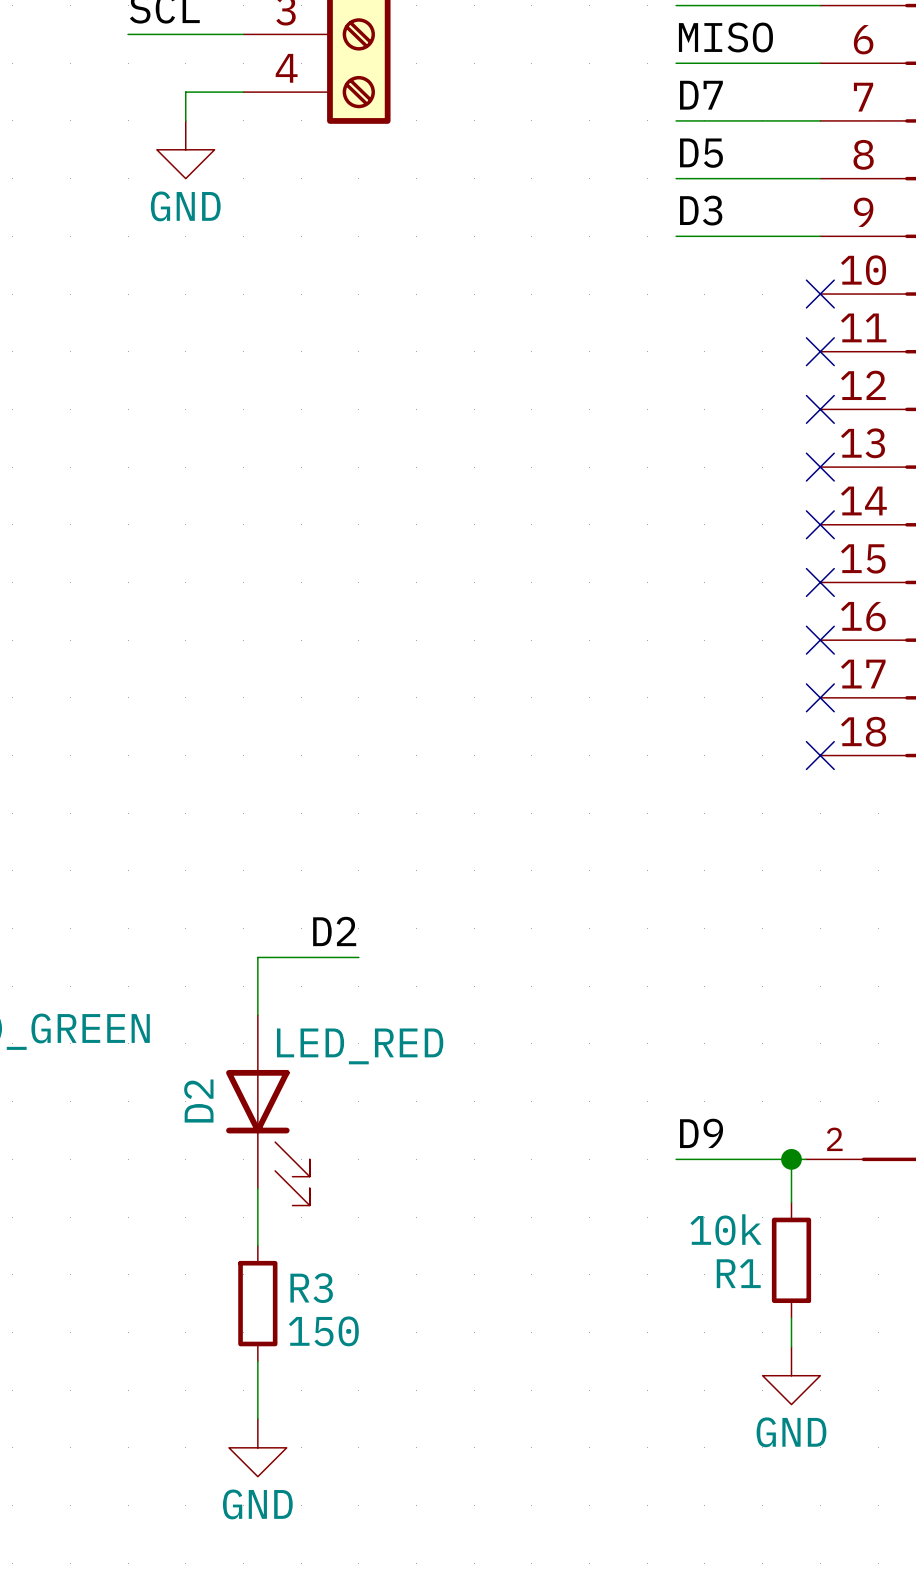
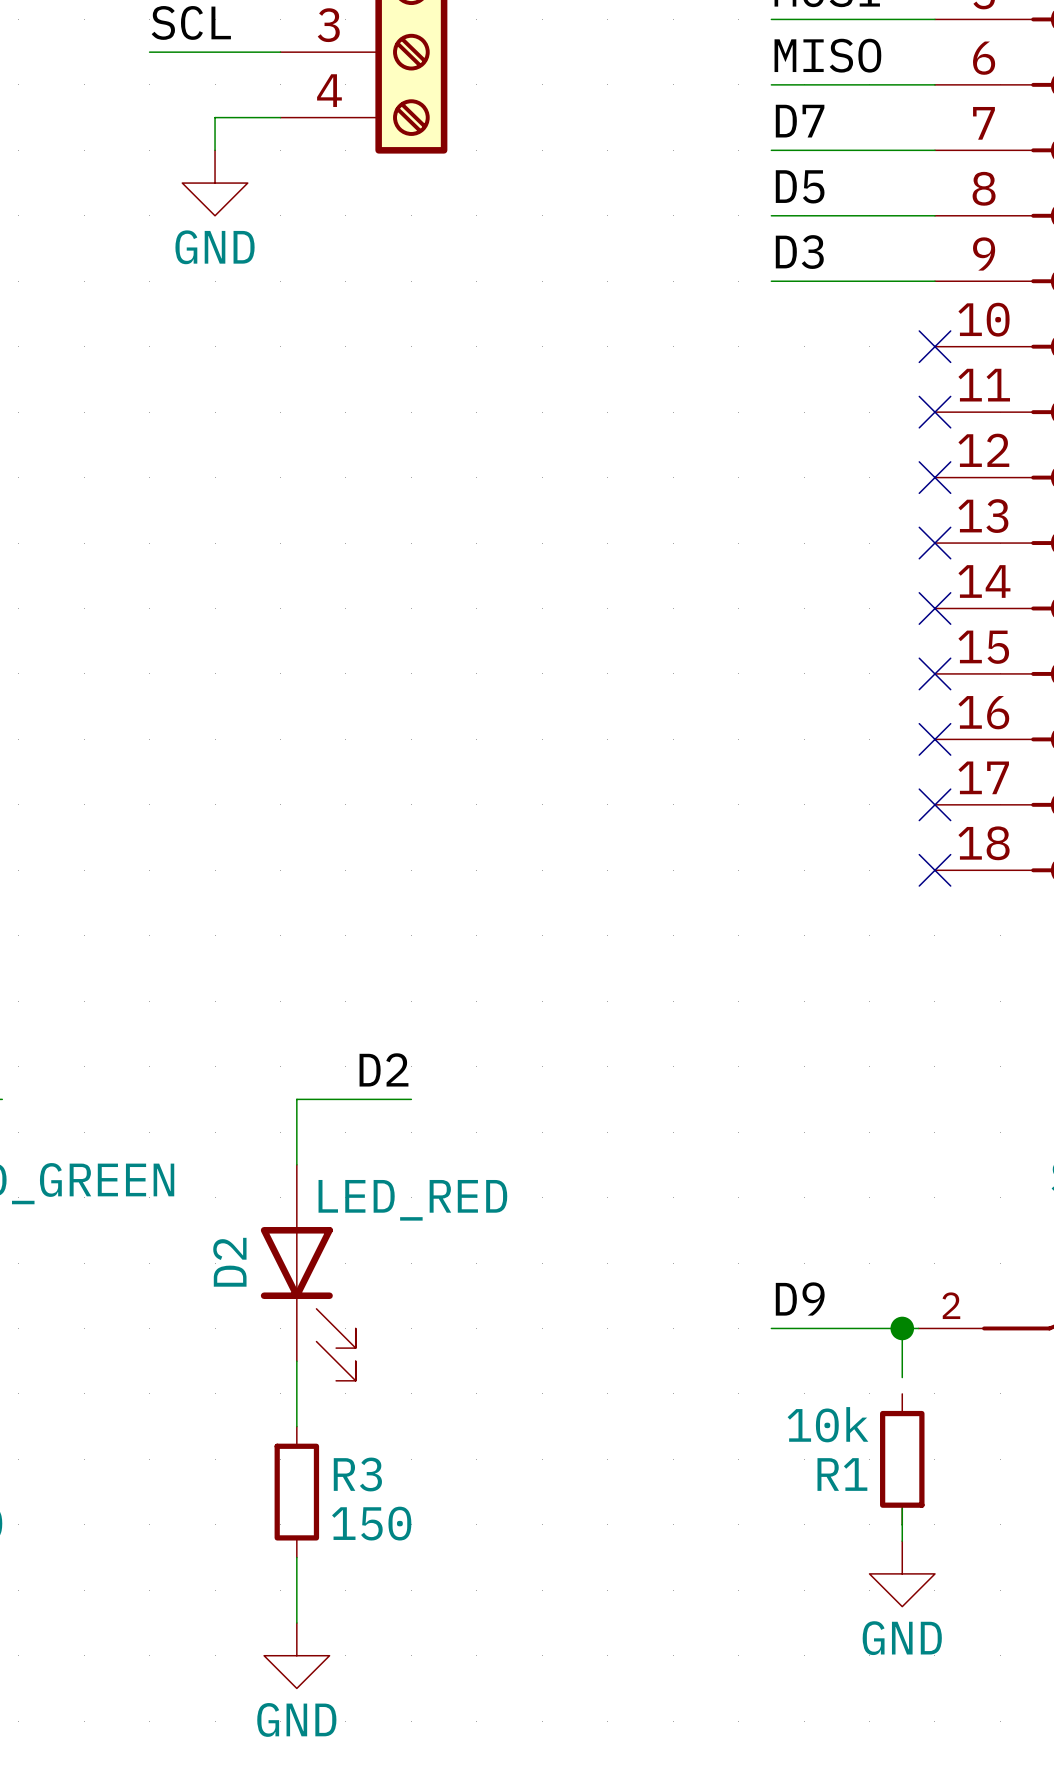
R1 position: (791, 1260) -> (902, 1459)

